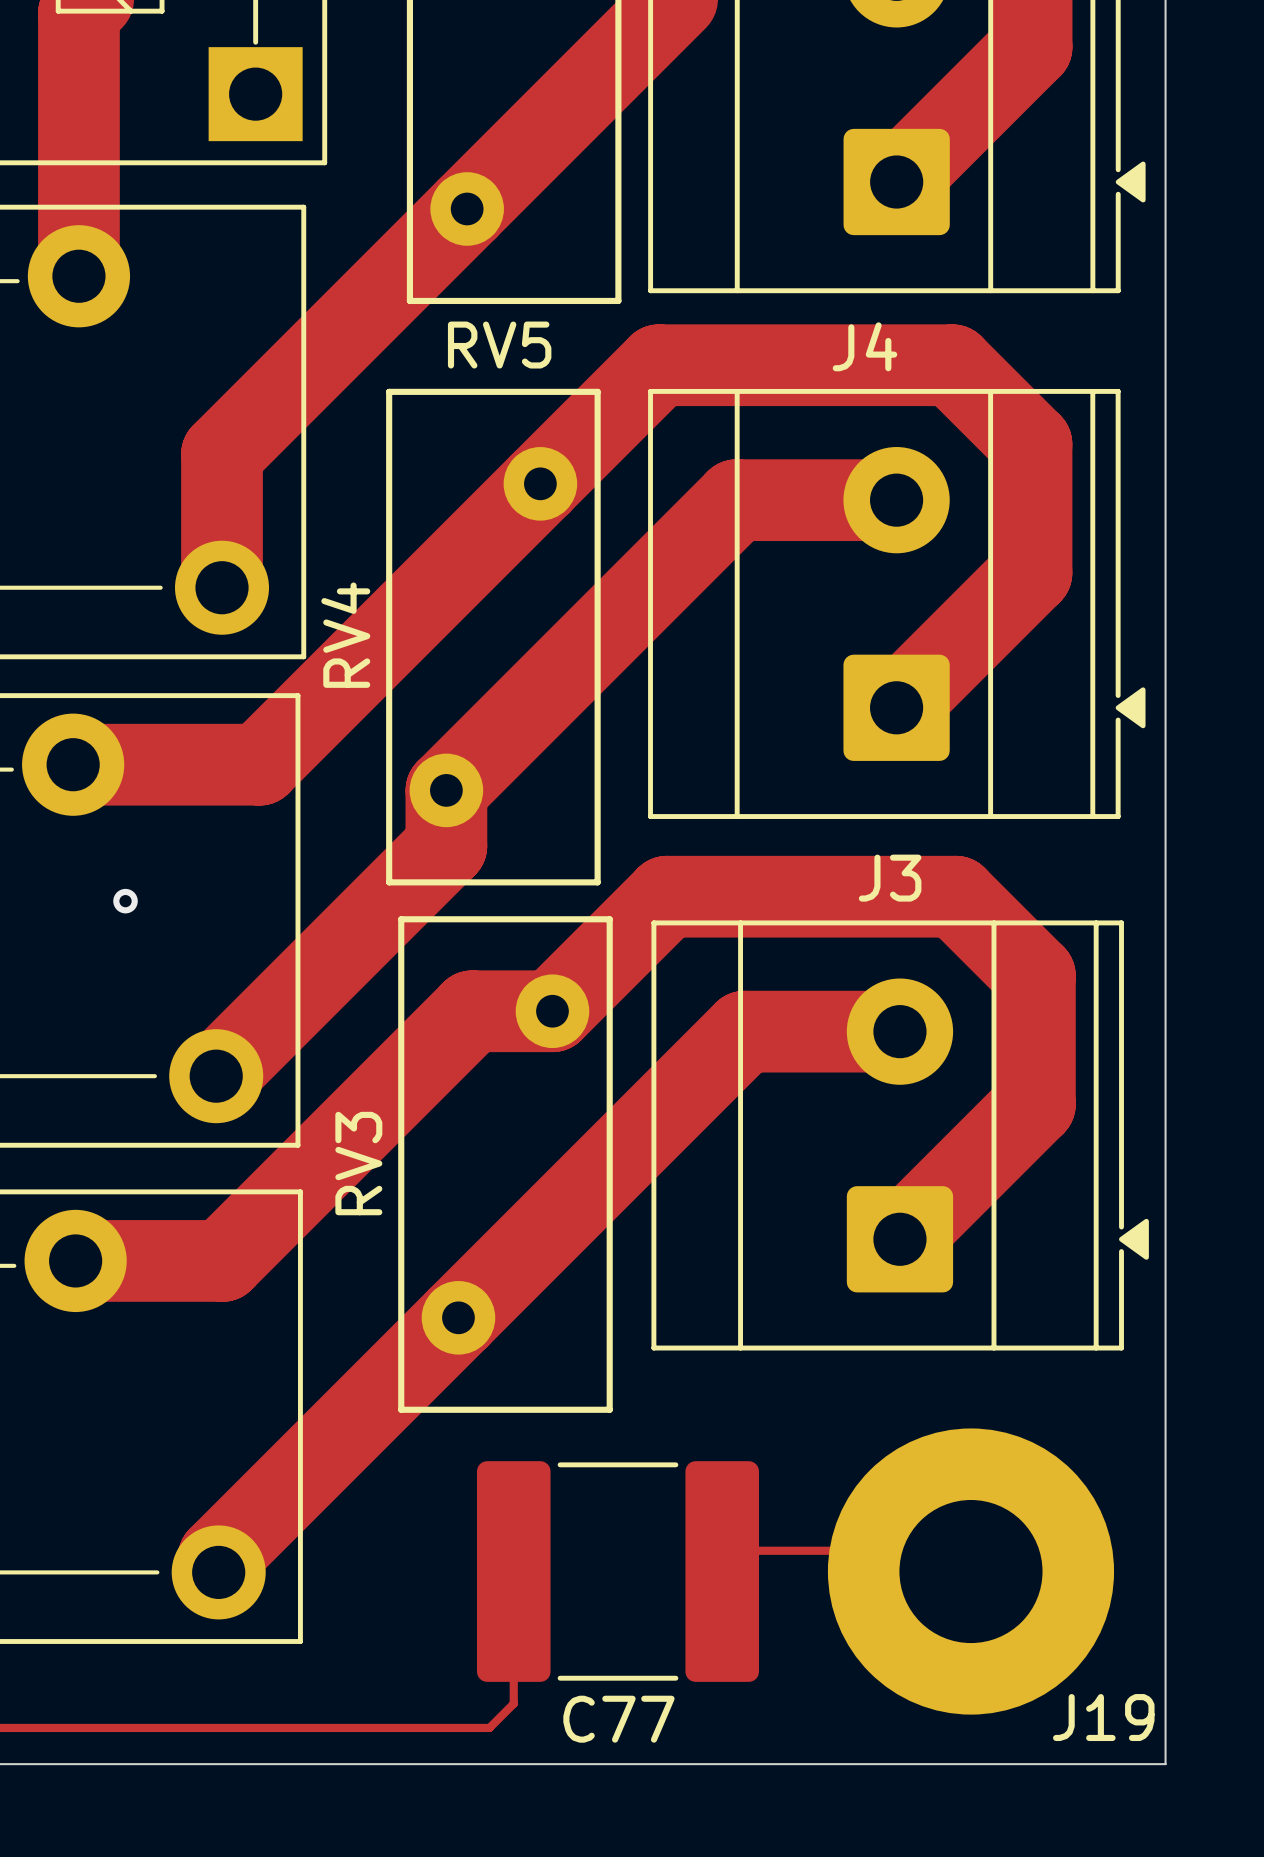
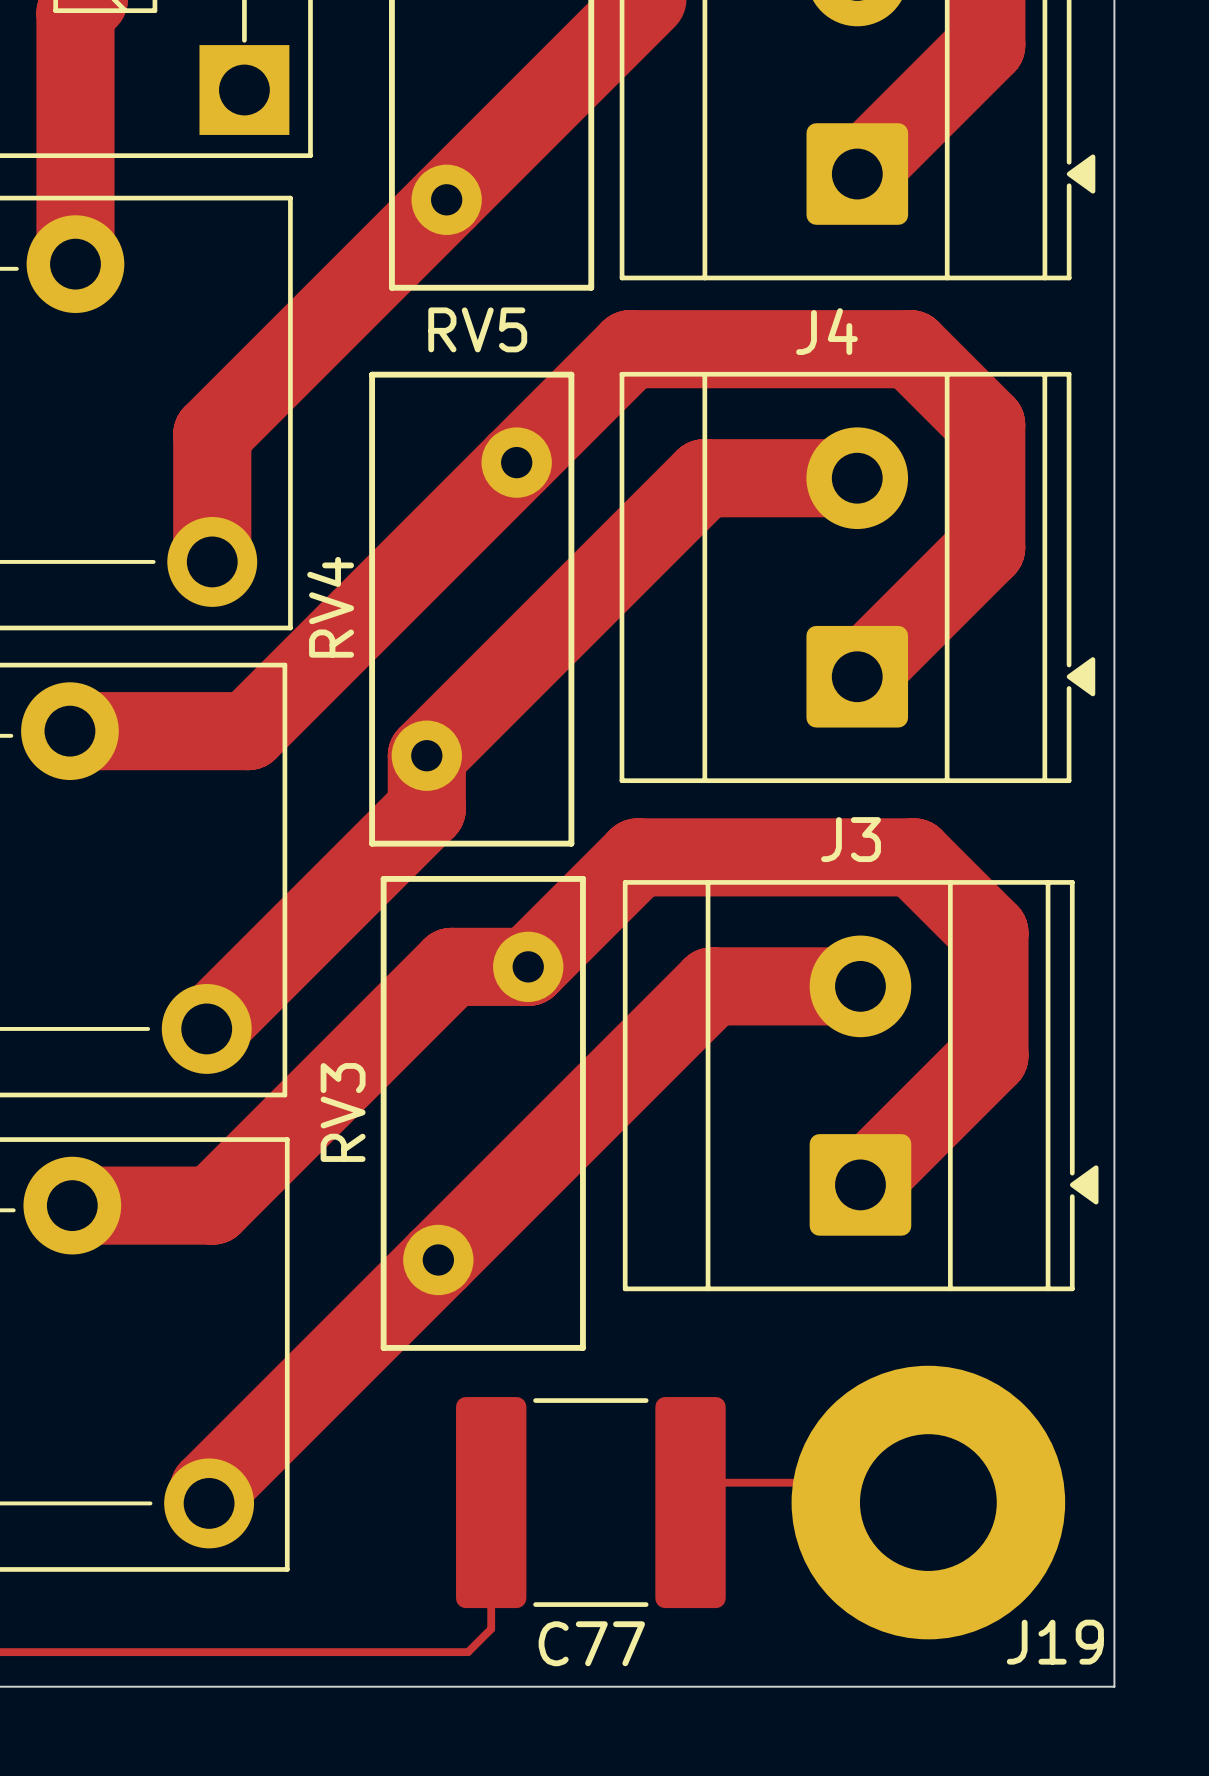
via: (125, 901) -> none

